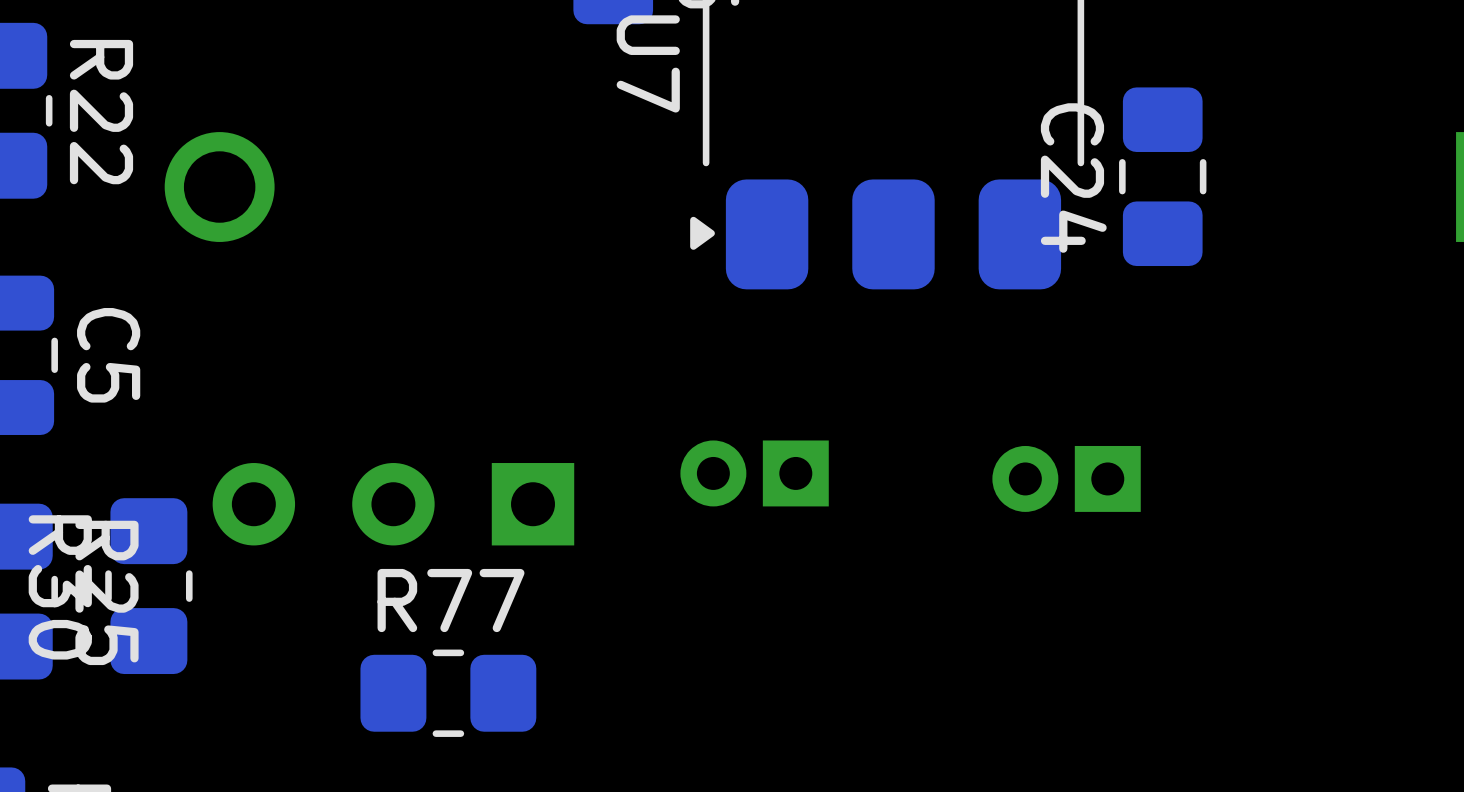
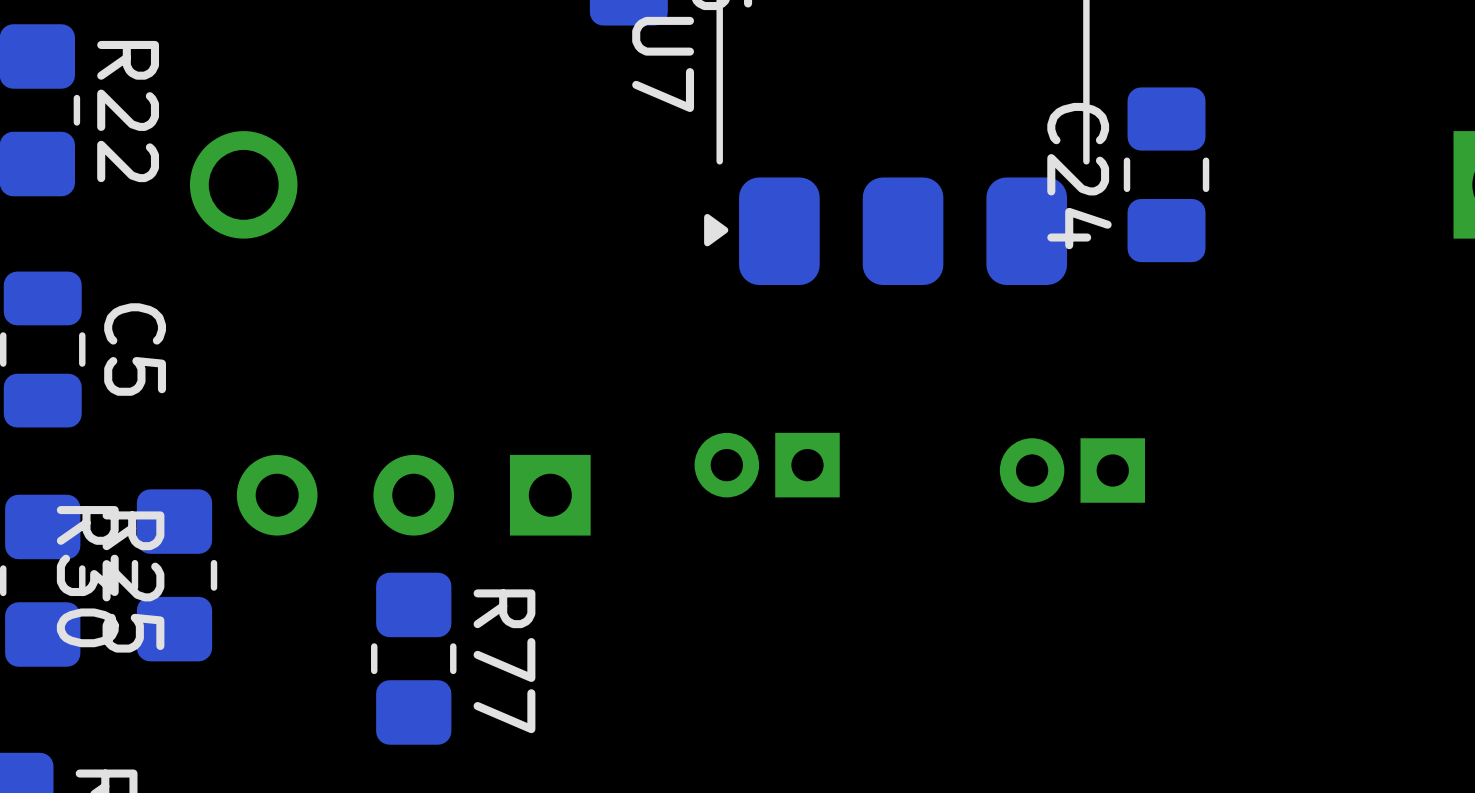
R77 rotation: 0° (448, 693) -> 90° clockwise (413, 658)

